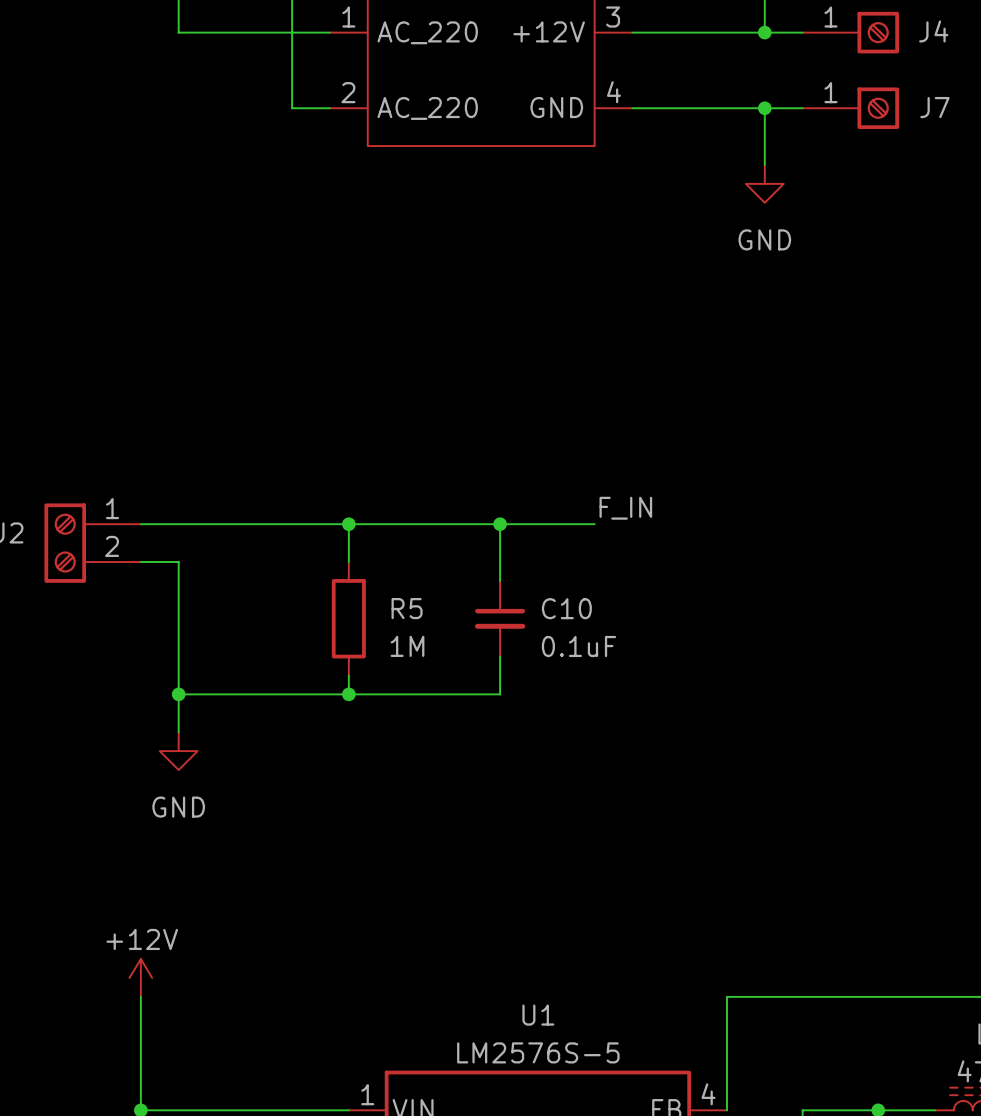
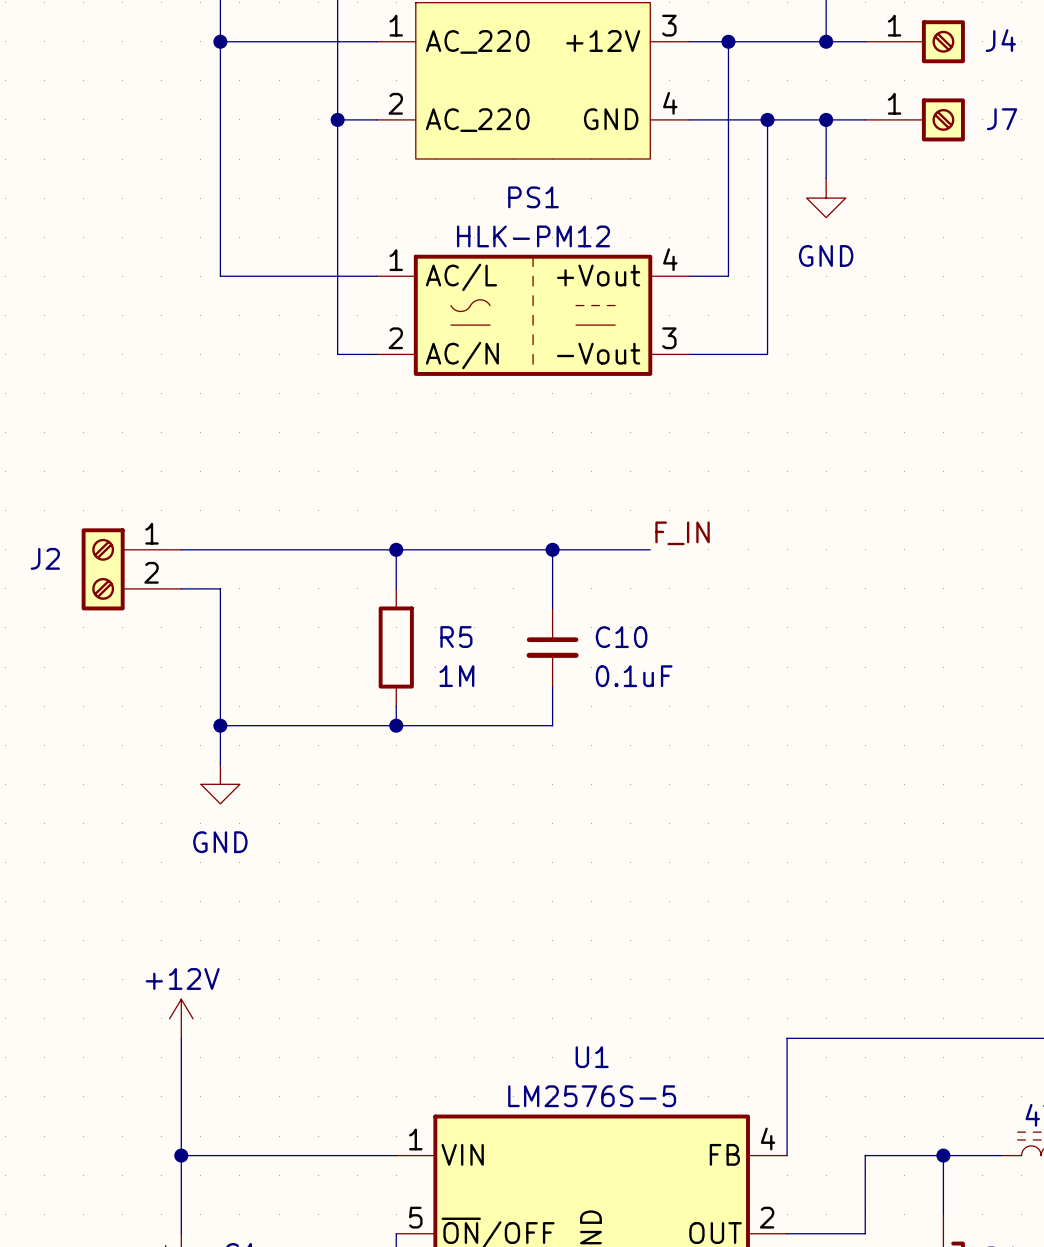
wire: none -> (220, 41) (220, 276) (376, 276)
junction: none -> (220, 41)
wire: none -> (728, 41) (728, 276) (689, 276)
junction: none -> (728, 41)
wire: none -> (337, 119) (337, 354) (376, 354)
junction: none -> (337, 119)
wire: none -> (767, 119) (767, 354) (689, 354)
junction: none -> (767, 119)
PS1: none -> HLK-PM12 (533, 315)

